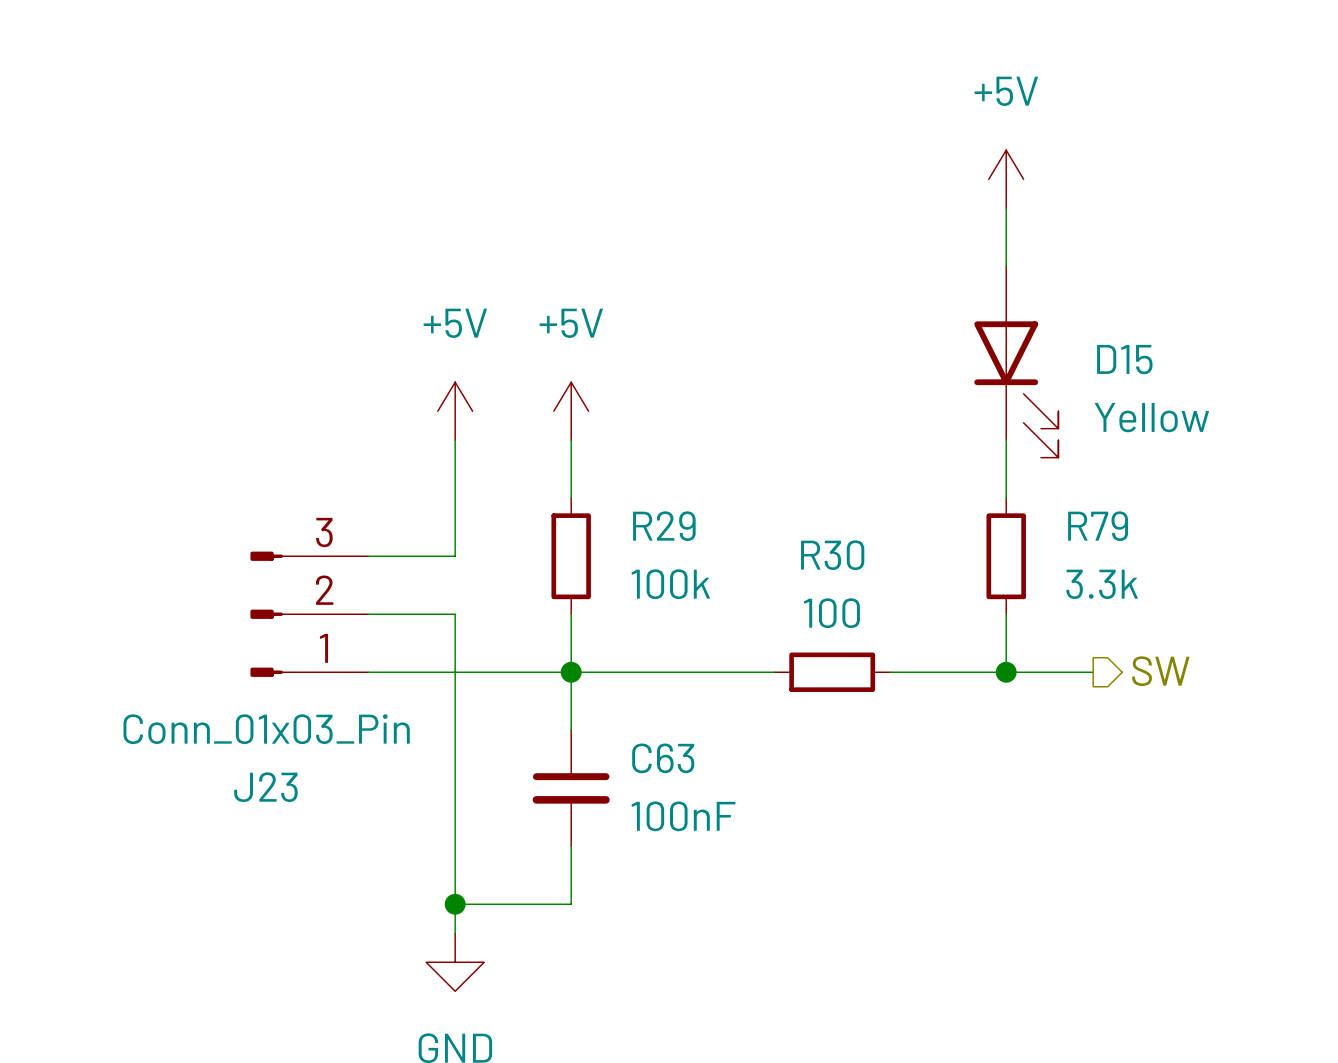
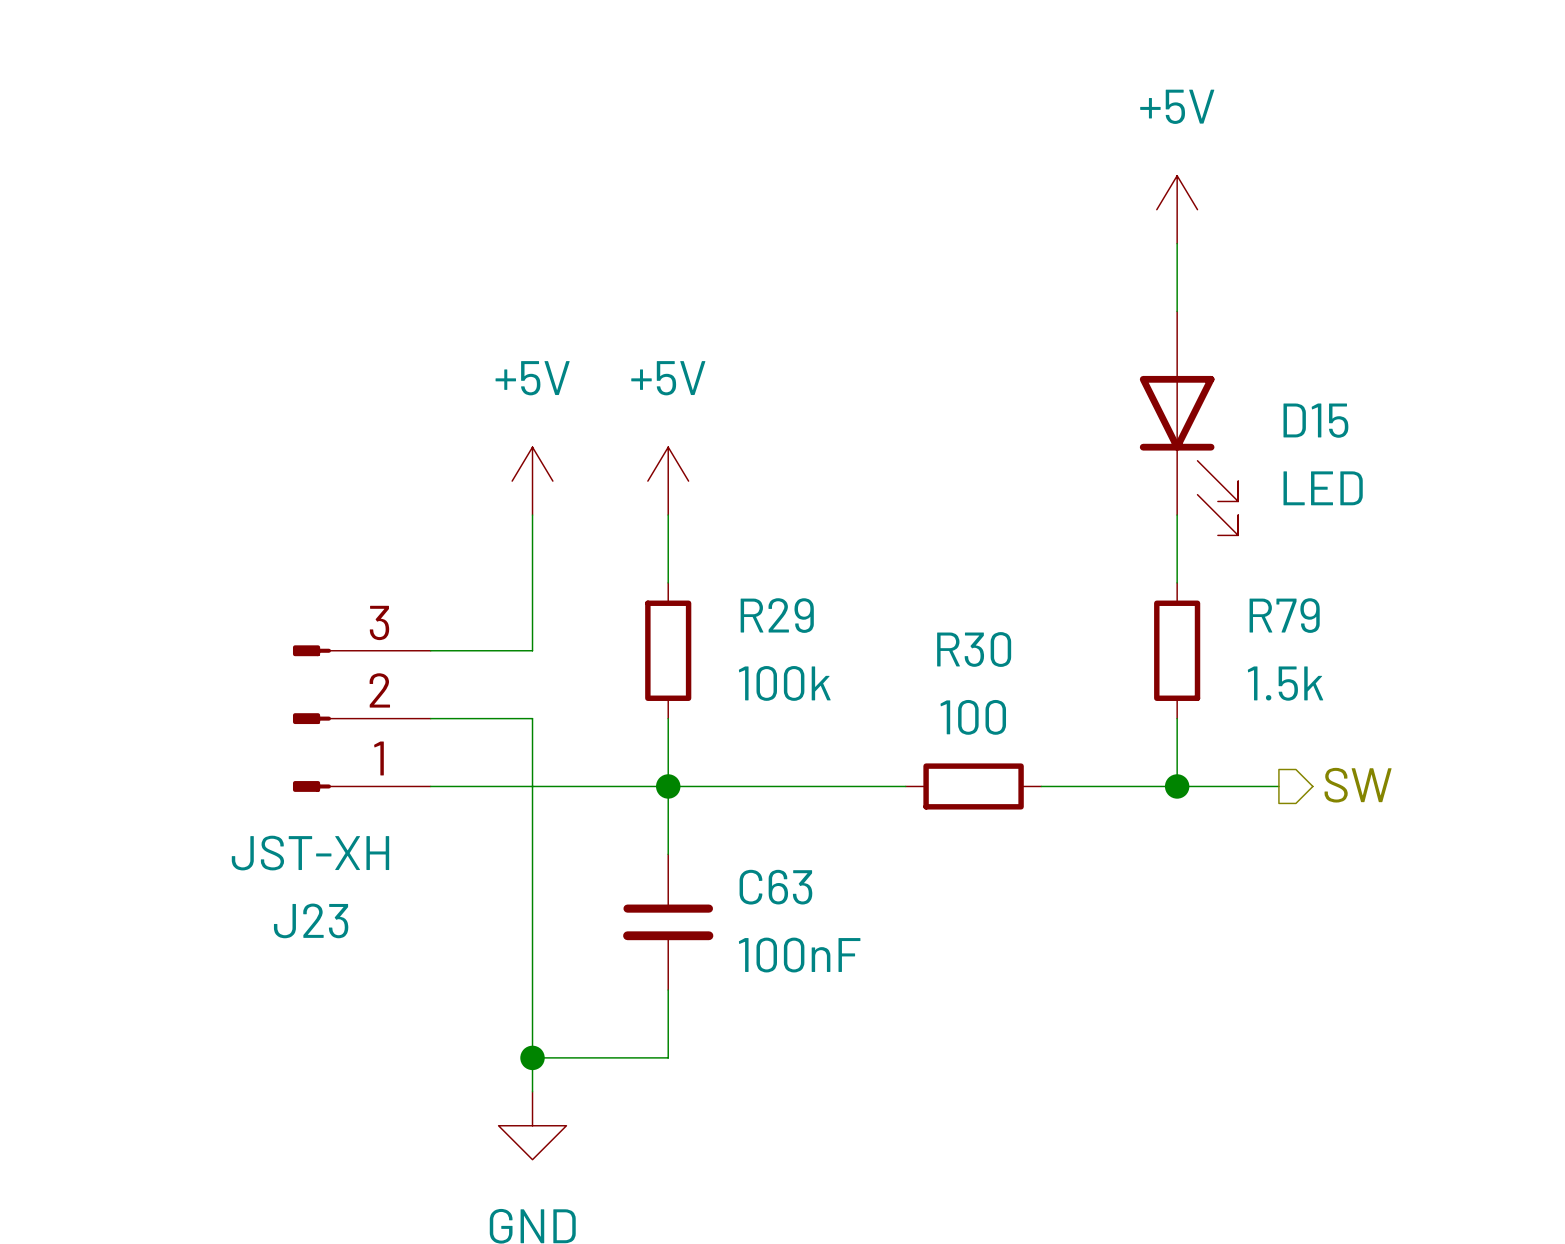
D15 value: Yellow (1151, 417) -> LED (1323, 488)
R79 value: 3.3k (1102, 584) -> 1.5k (1285, 683)
J23 value: Conn_01x03_Pin (266, 729) -> JST-XH (310, 853)

